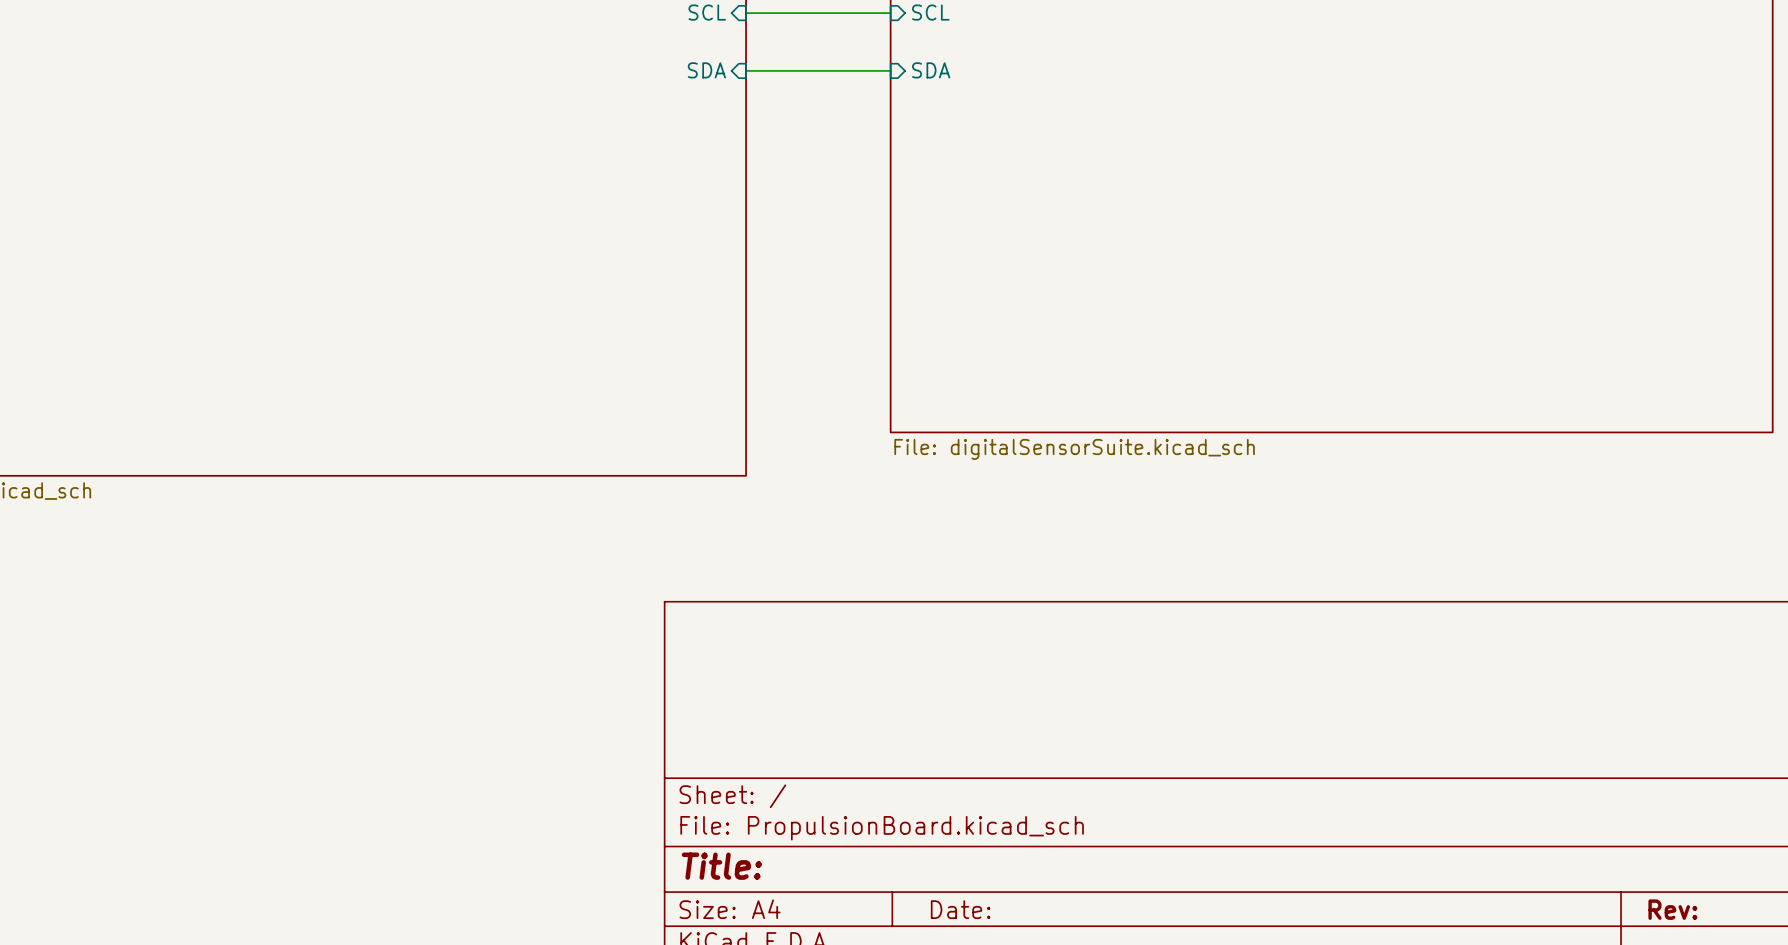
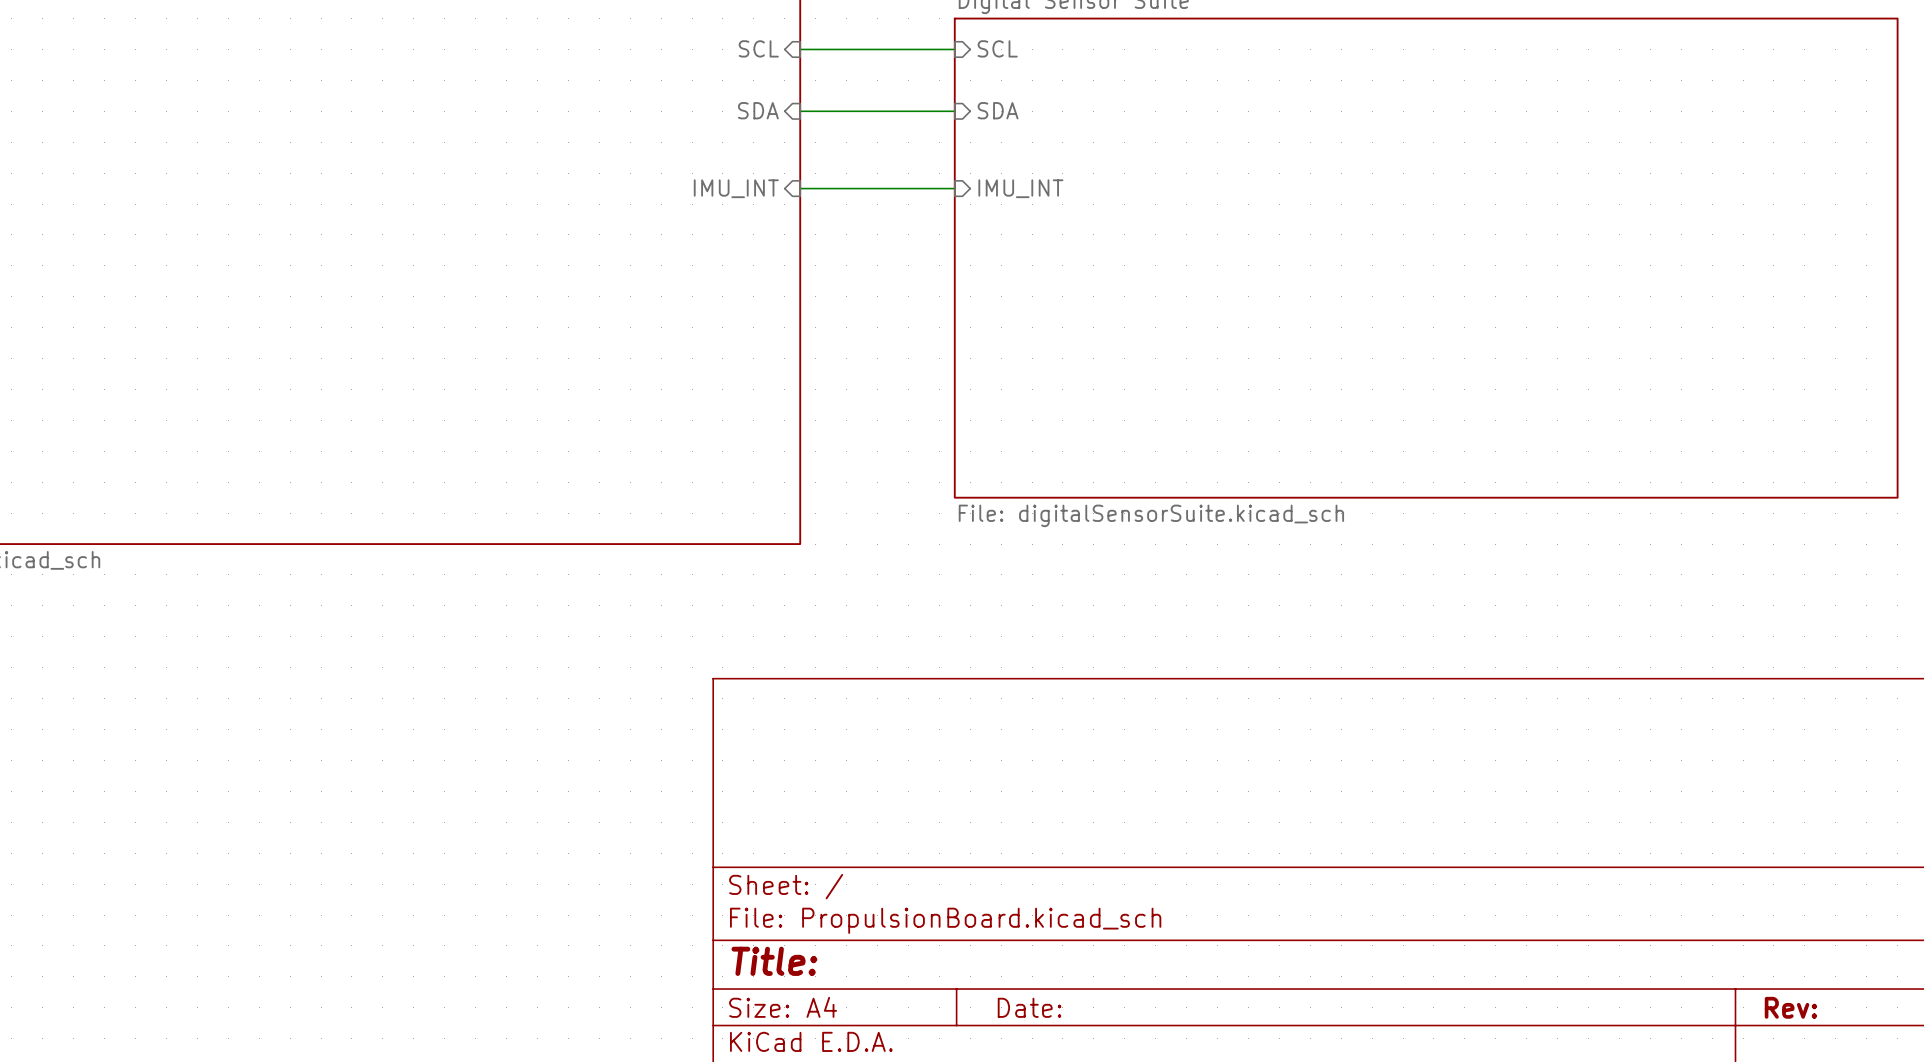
sheet pin: none -> IMU_INT (736, 188)
wire: none -> (800, 188) (954, 188)
sheet pin: none -> IMU_INT (1020, 188)

